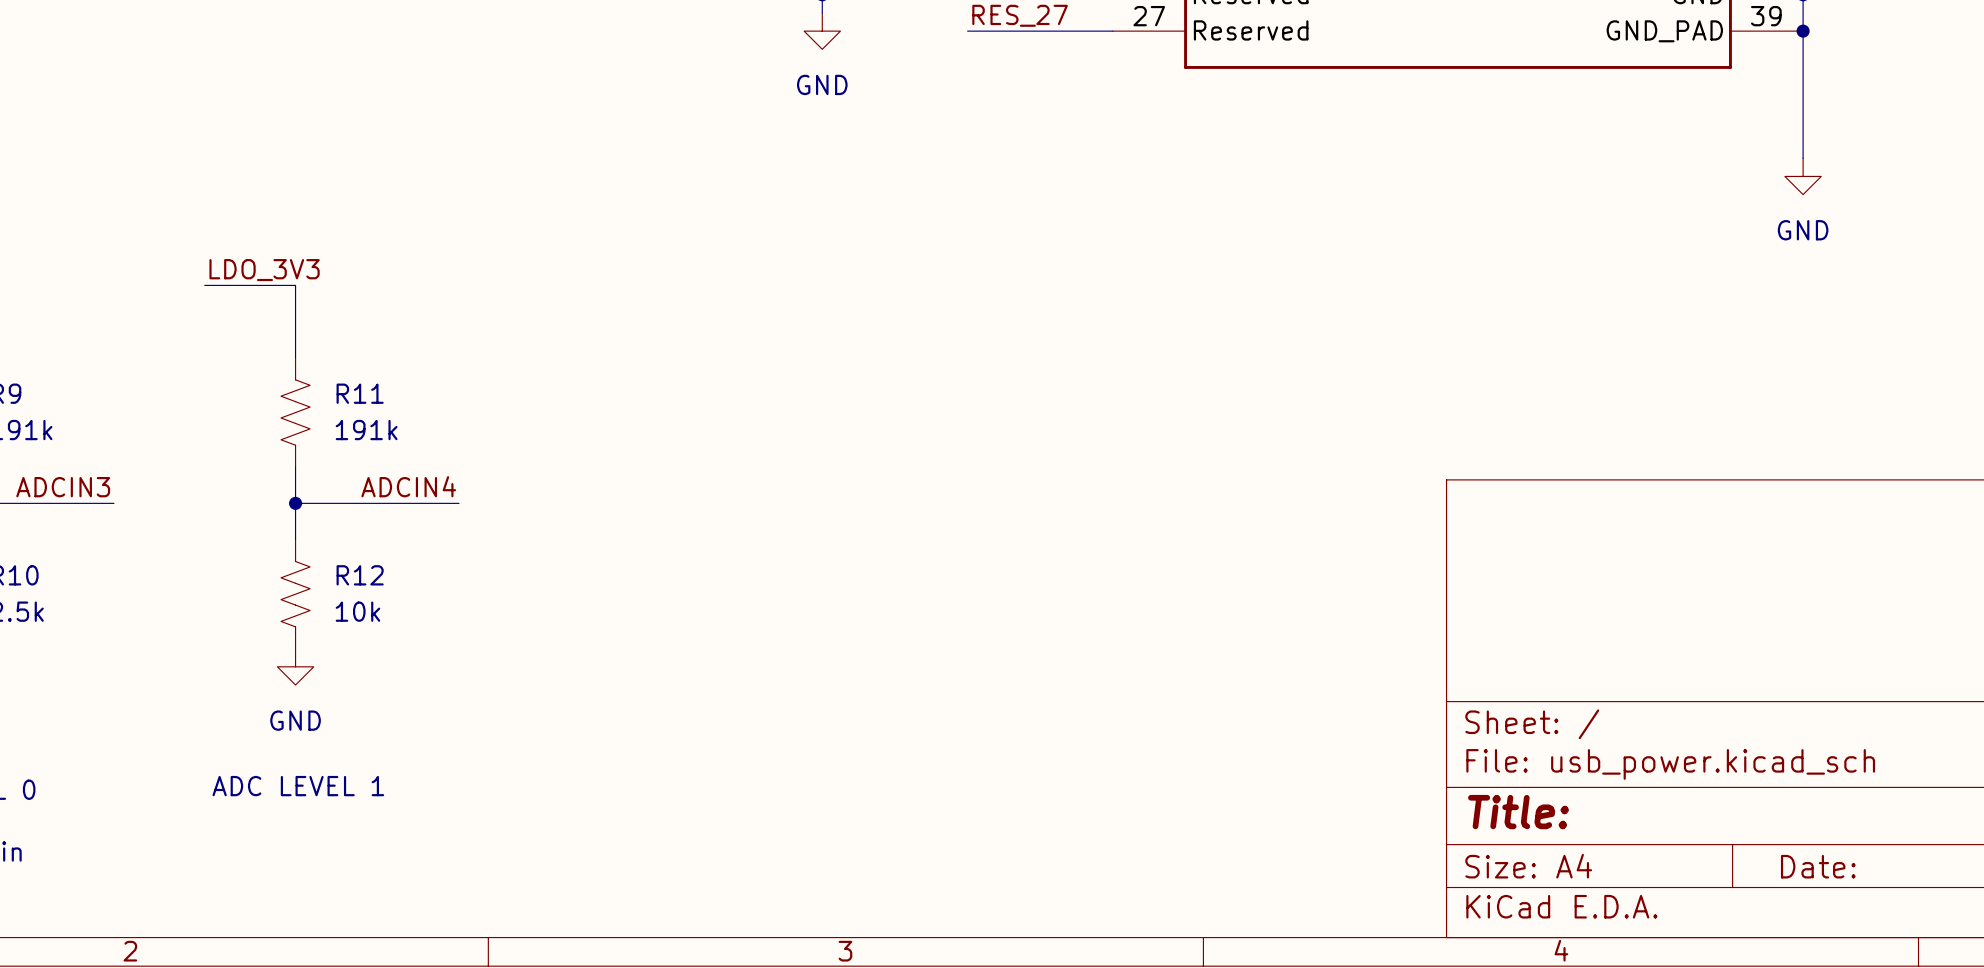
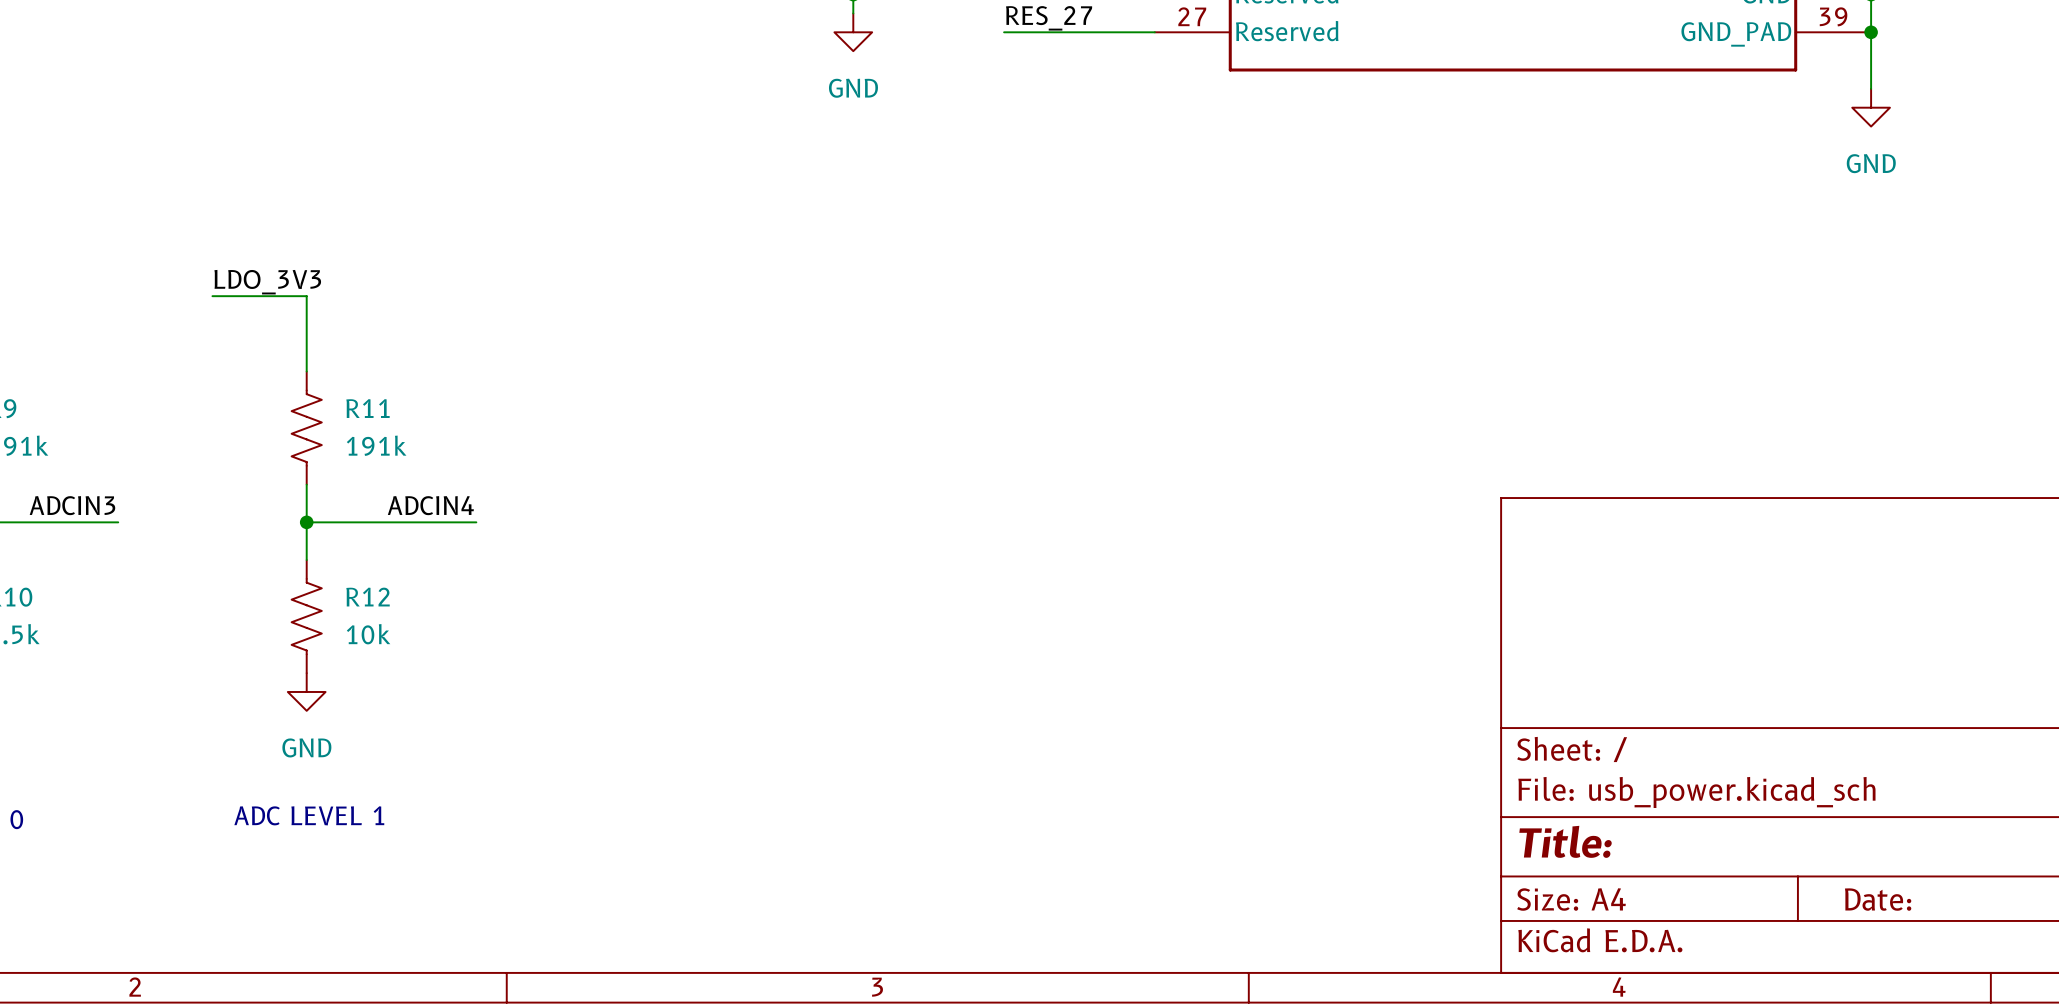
wire: (1803, 85) (1803, 158) -> none
power symbol position: GND (1803, 176) -> GND (1871, 107)

